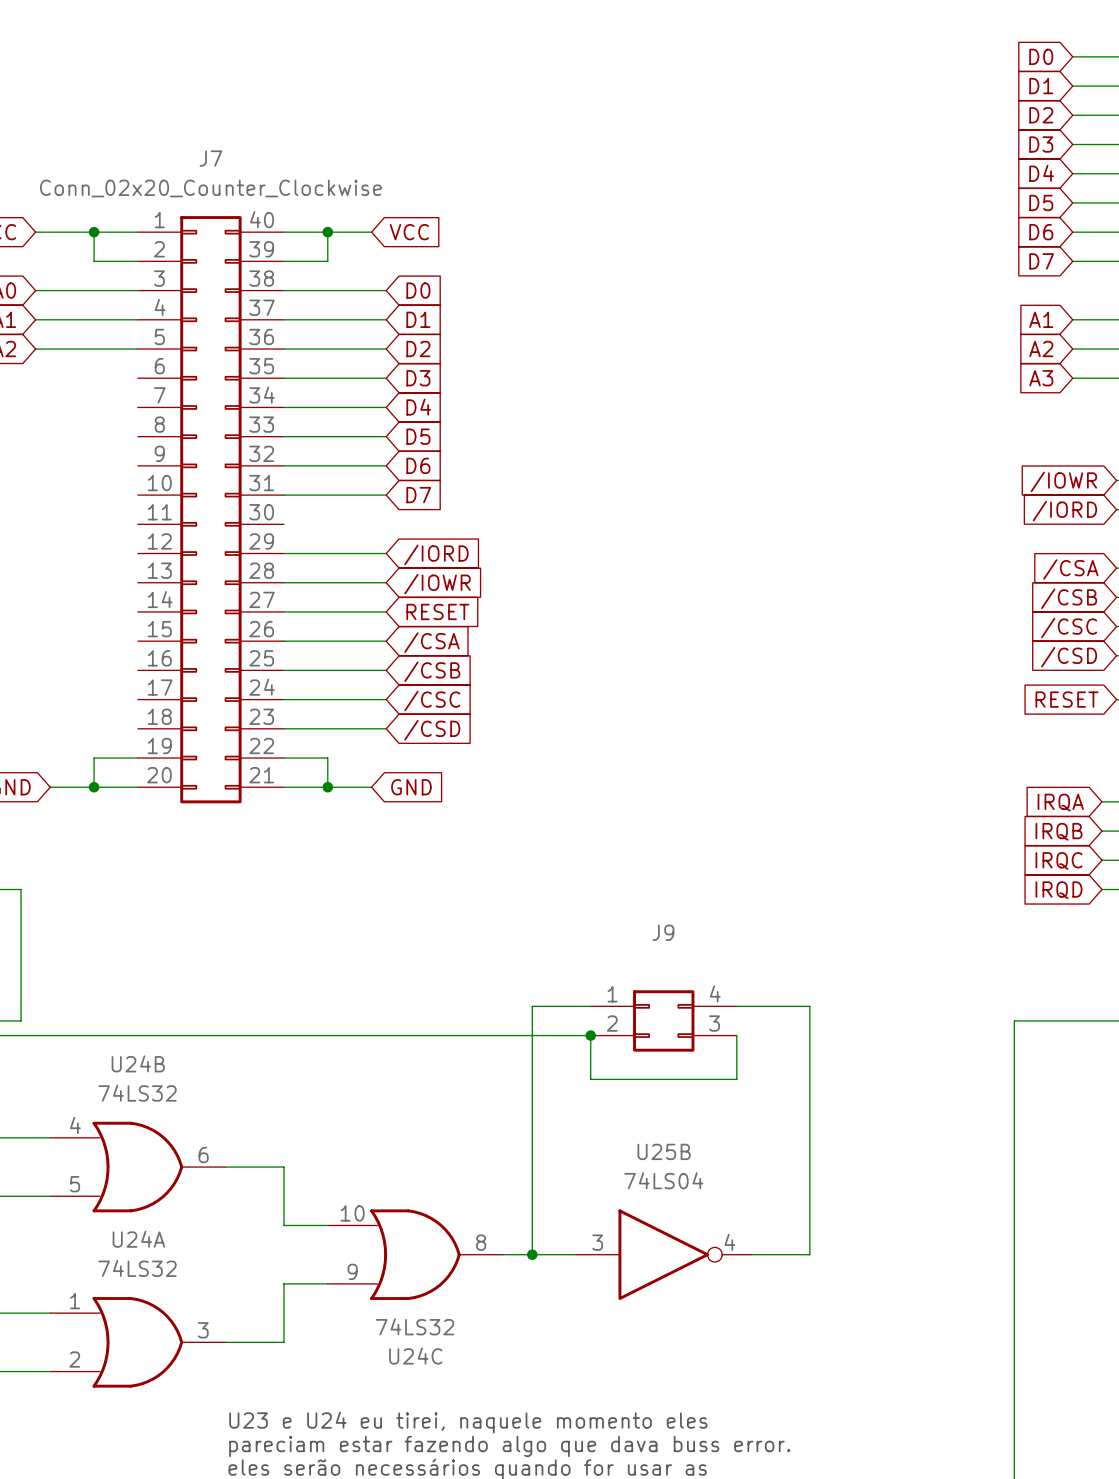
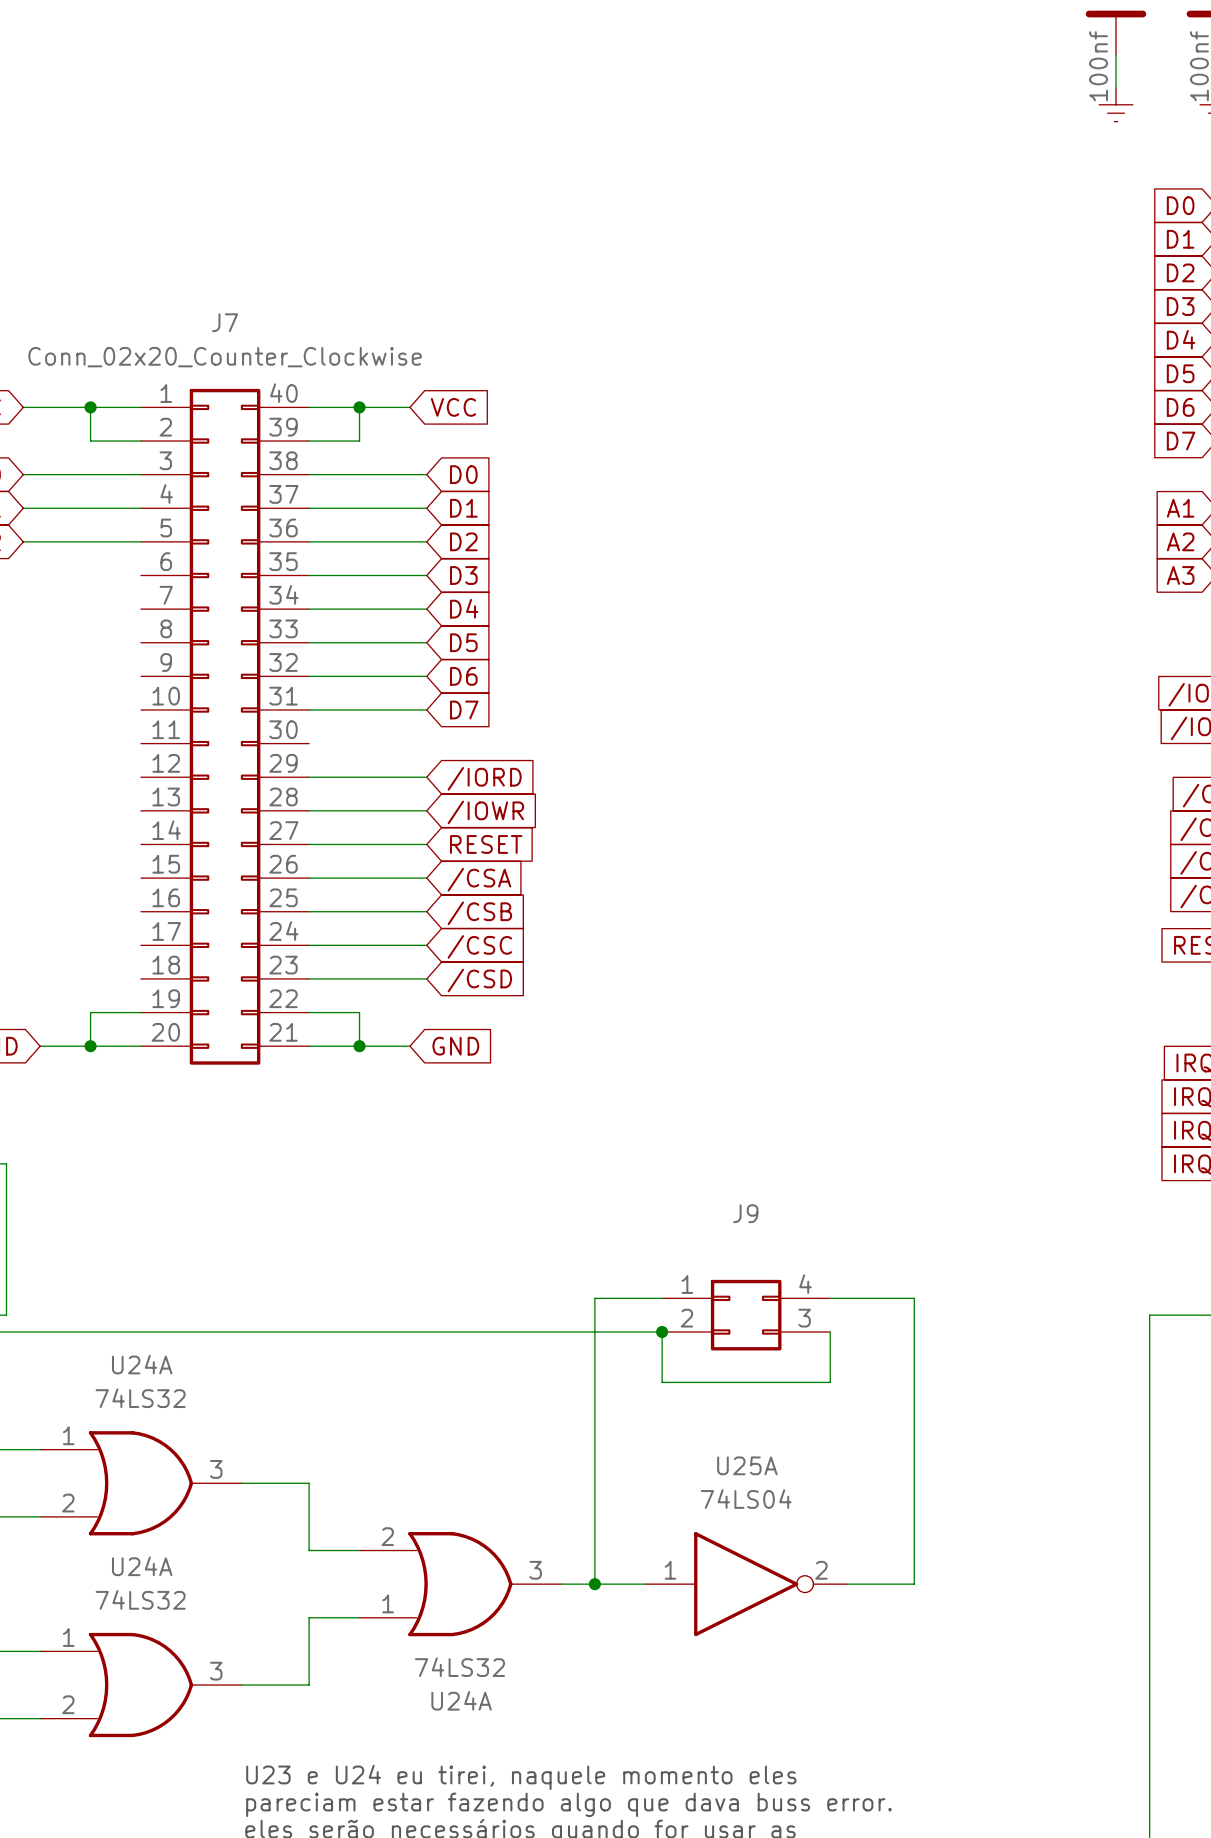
U24B name: U24B (138, 1063) -> U24A (142, 1364)
U24B pin number: 4 (75, 1125) -> 1 (68, 1435)
U25B name: U25B (664, 1151) -> U25A (747, 1465)
U24B pin number: 6 (203, 1155) -> 3 (216, 1469)
U24B pin number: 5 (75, 1184) -> 2 (68, 1503)
U24C pin number: 10 (352, 1213) -> 2 (387, 1536)
U24C pin number: 8 (481, 1242) -> 3 (535, 1570)
U25B pin number: 3 (597, 1242) -> 1 (670, 1570)
U25B pin number: 4 (729, 1242) -> 2 (821, 1570)
U24C pin number: 9 (352, 1271) -> 1 (388, 1603)
U24C name: U24C (415, 1356) -> U24A (461, 1700)

